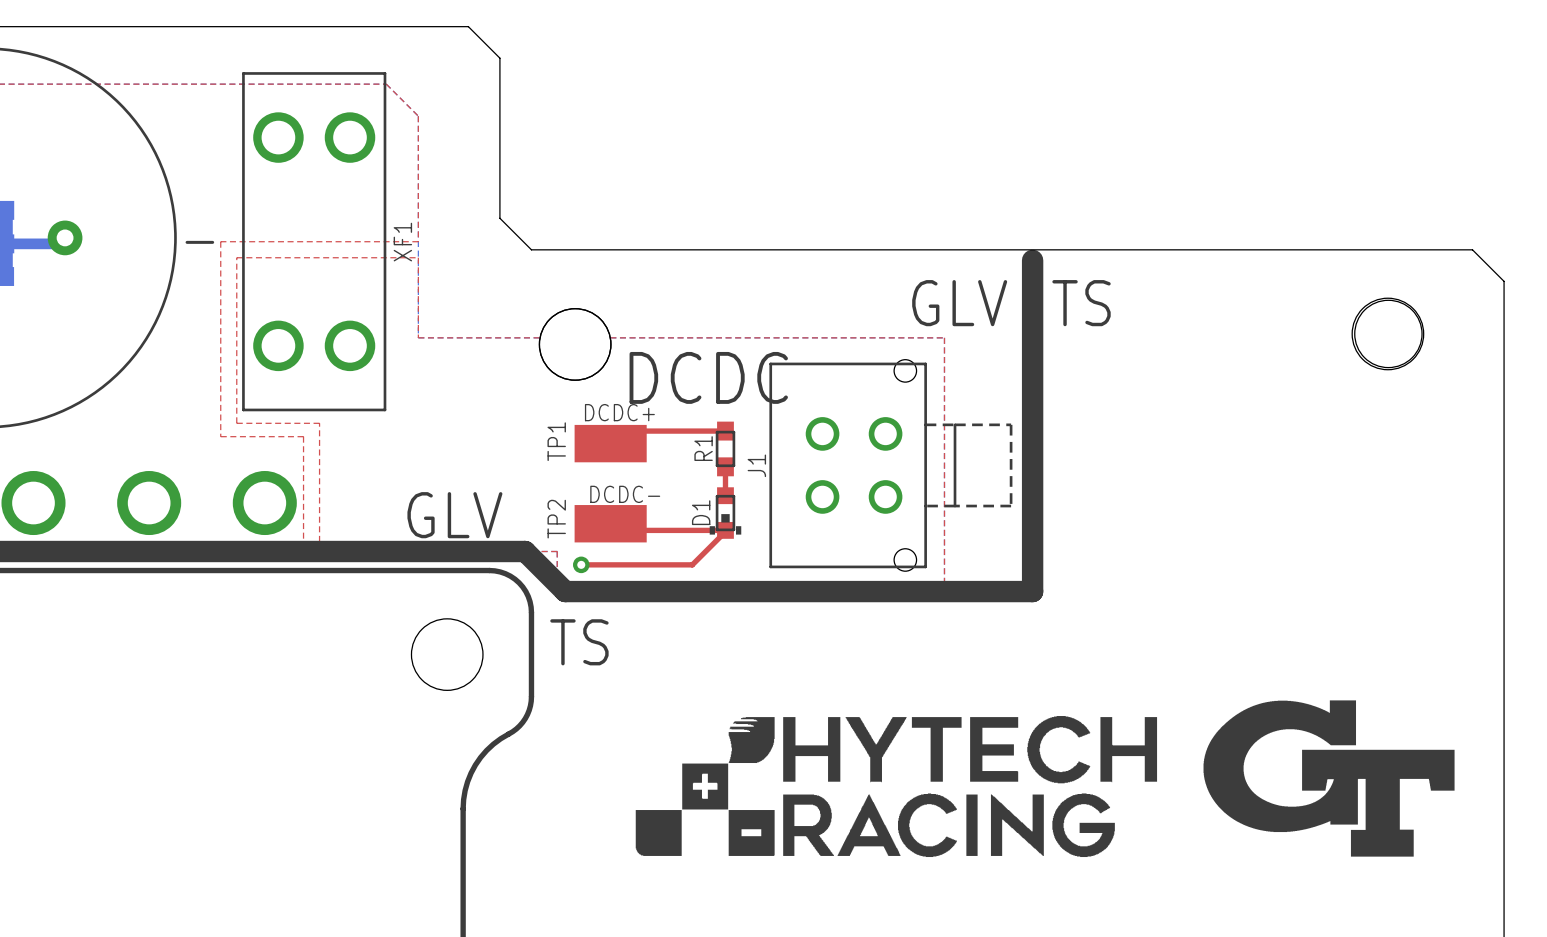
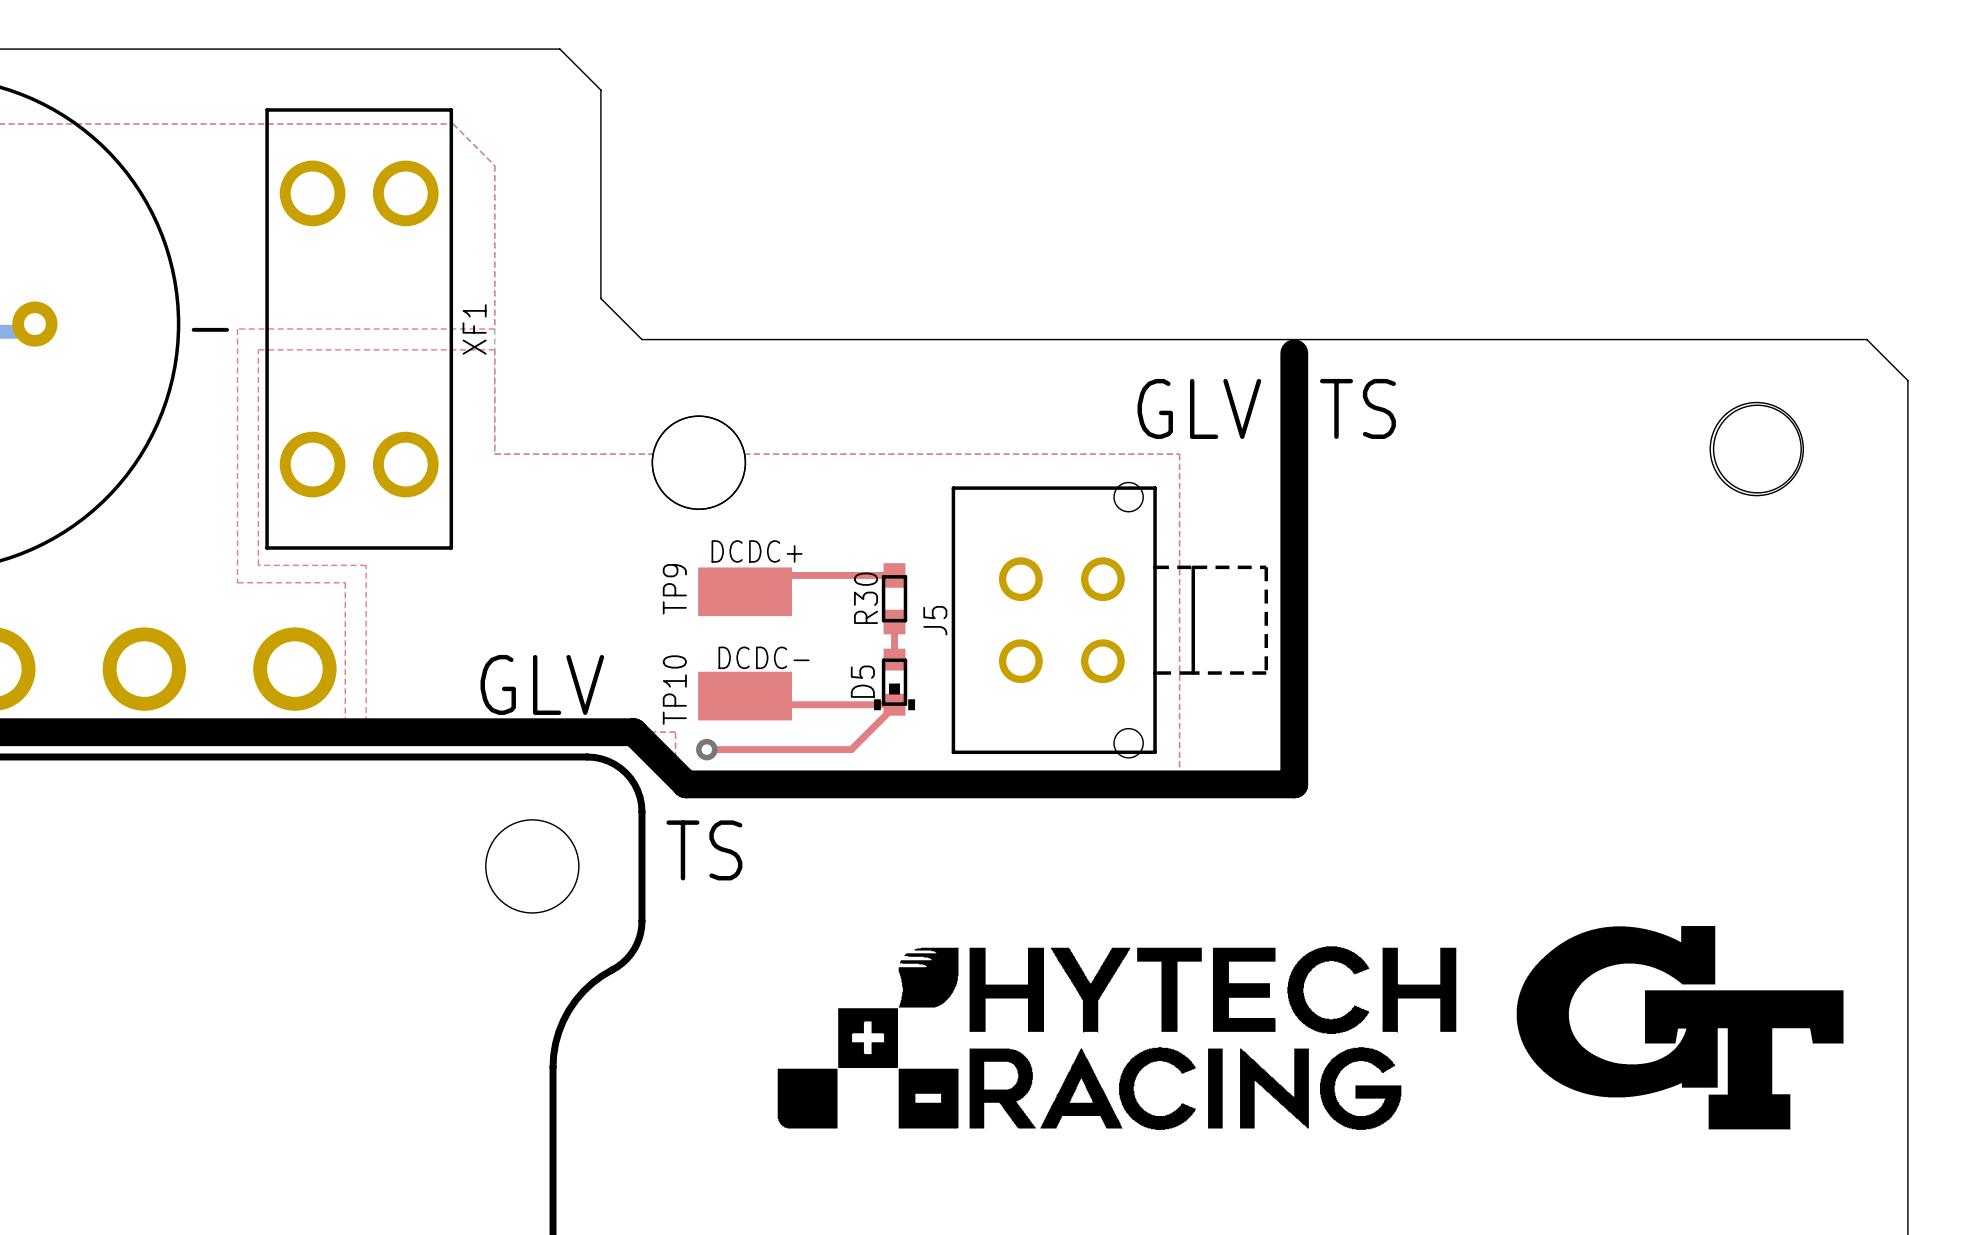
text: DCDC (708, 377) -> none
TP1 name: TP1 (556, 441) -> TP9 (674, 589)
R1 name: R1 (703, 448) -> R30 (866, 598)
J1 name: J1 (756, 465) -> J5 (935, 620)
D1 name: D1 (701, 512) -> D5 (862, 681)
TP2 name: TP2 (556, 519) -> TP10 (674, 690)

